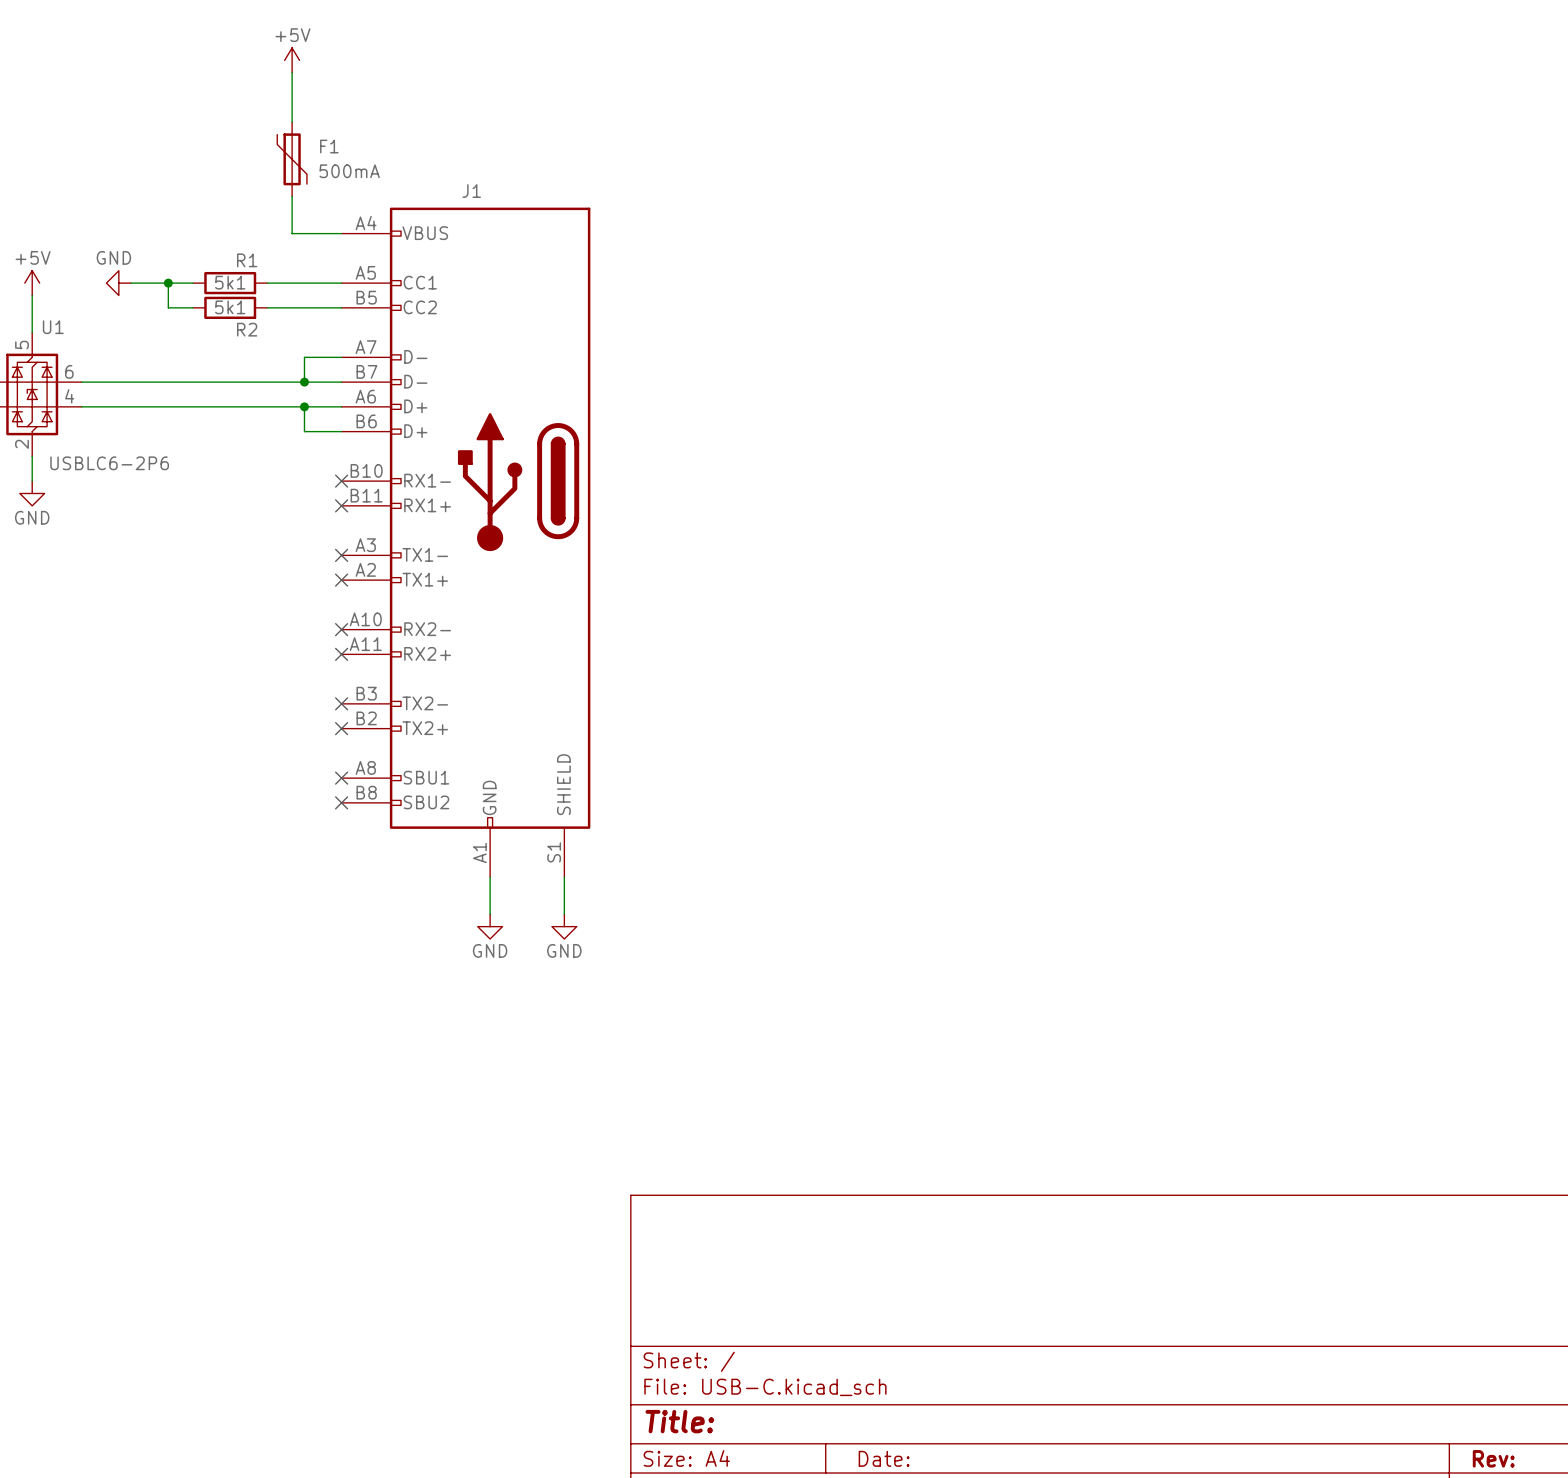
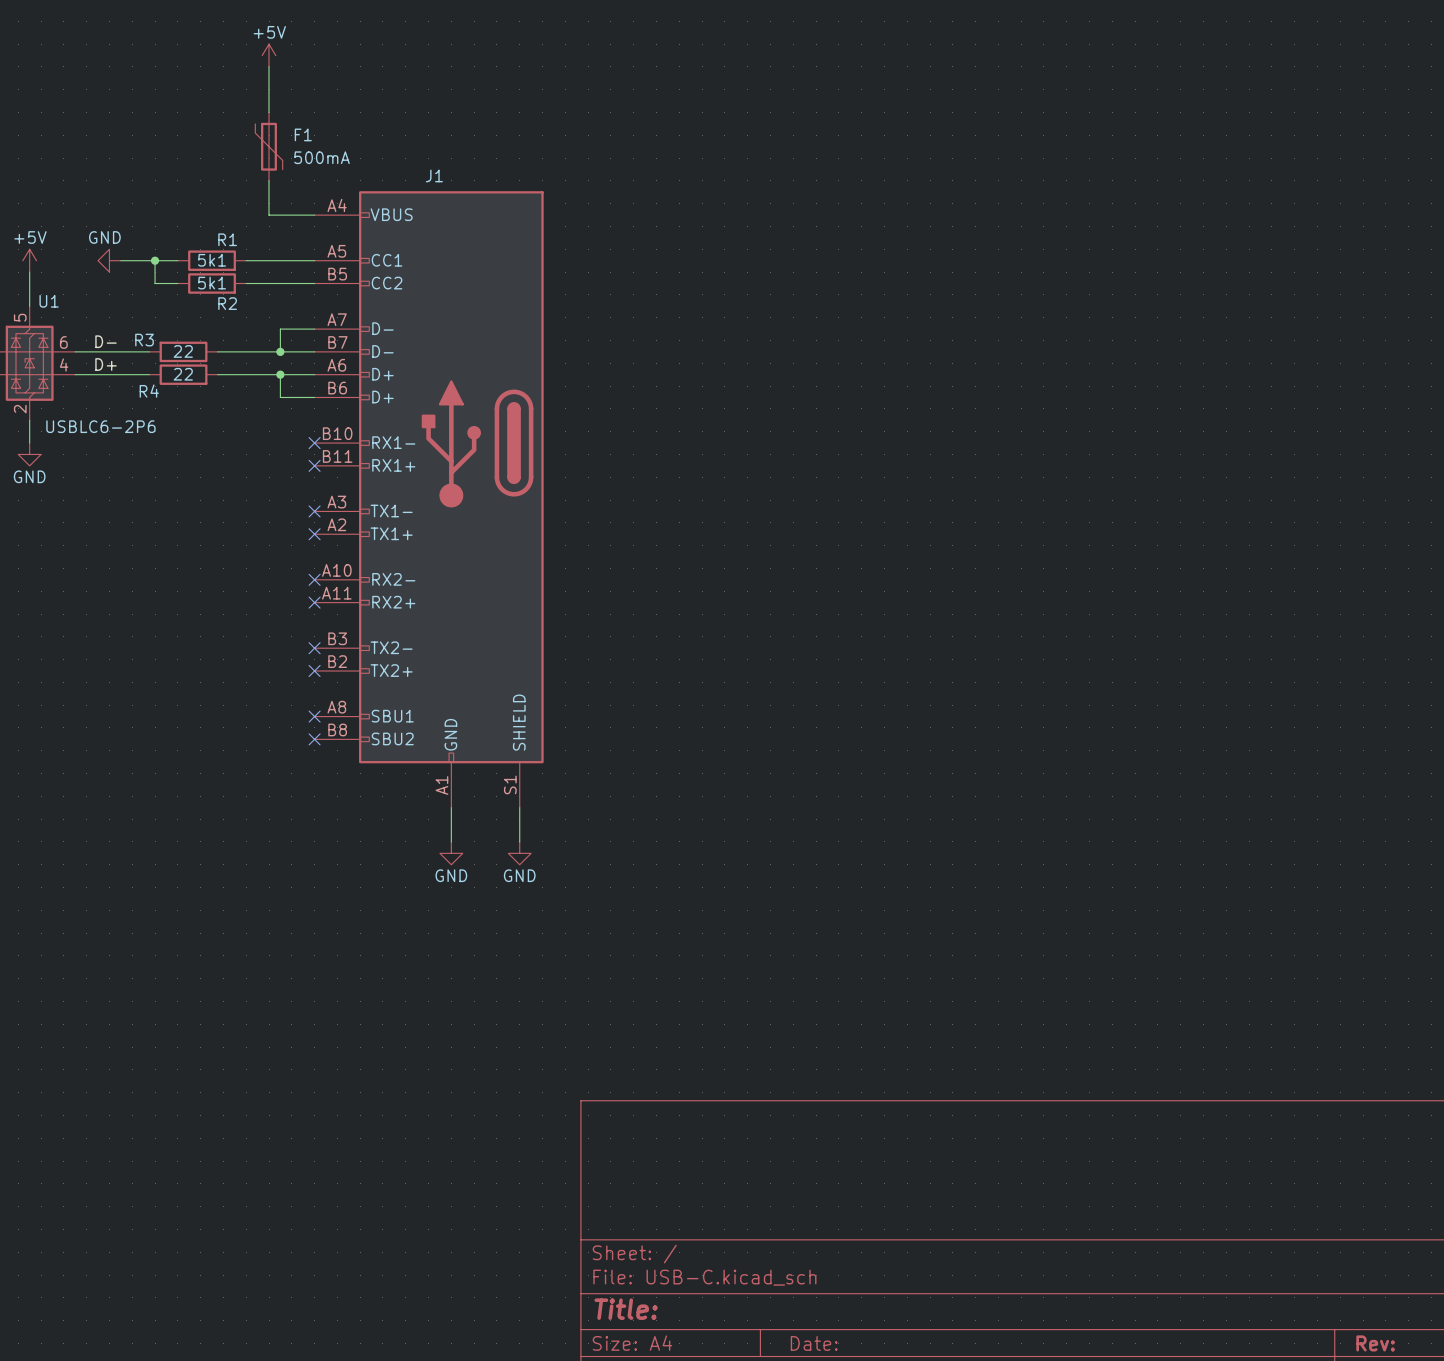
label: none -> D- (106, 341)
wire: (162, 382) (236, 382) -> none
R3: none -> 22 (183, 351)
label: none -> D+ (106, 364)
wire: (162, 406) (236, 406) -> none
R4: none -> 22 (183, 374)

